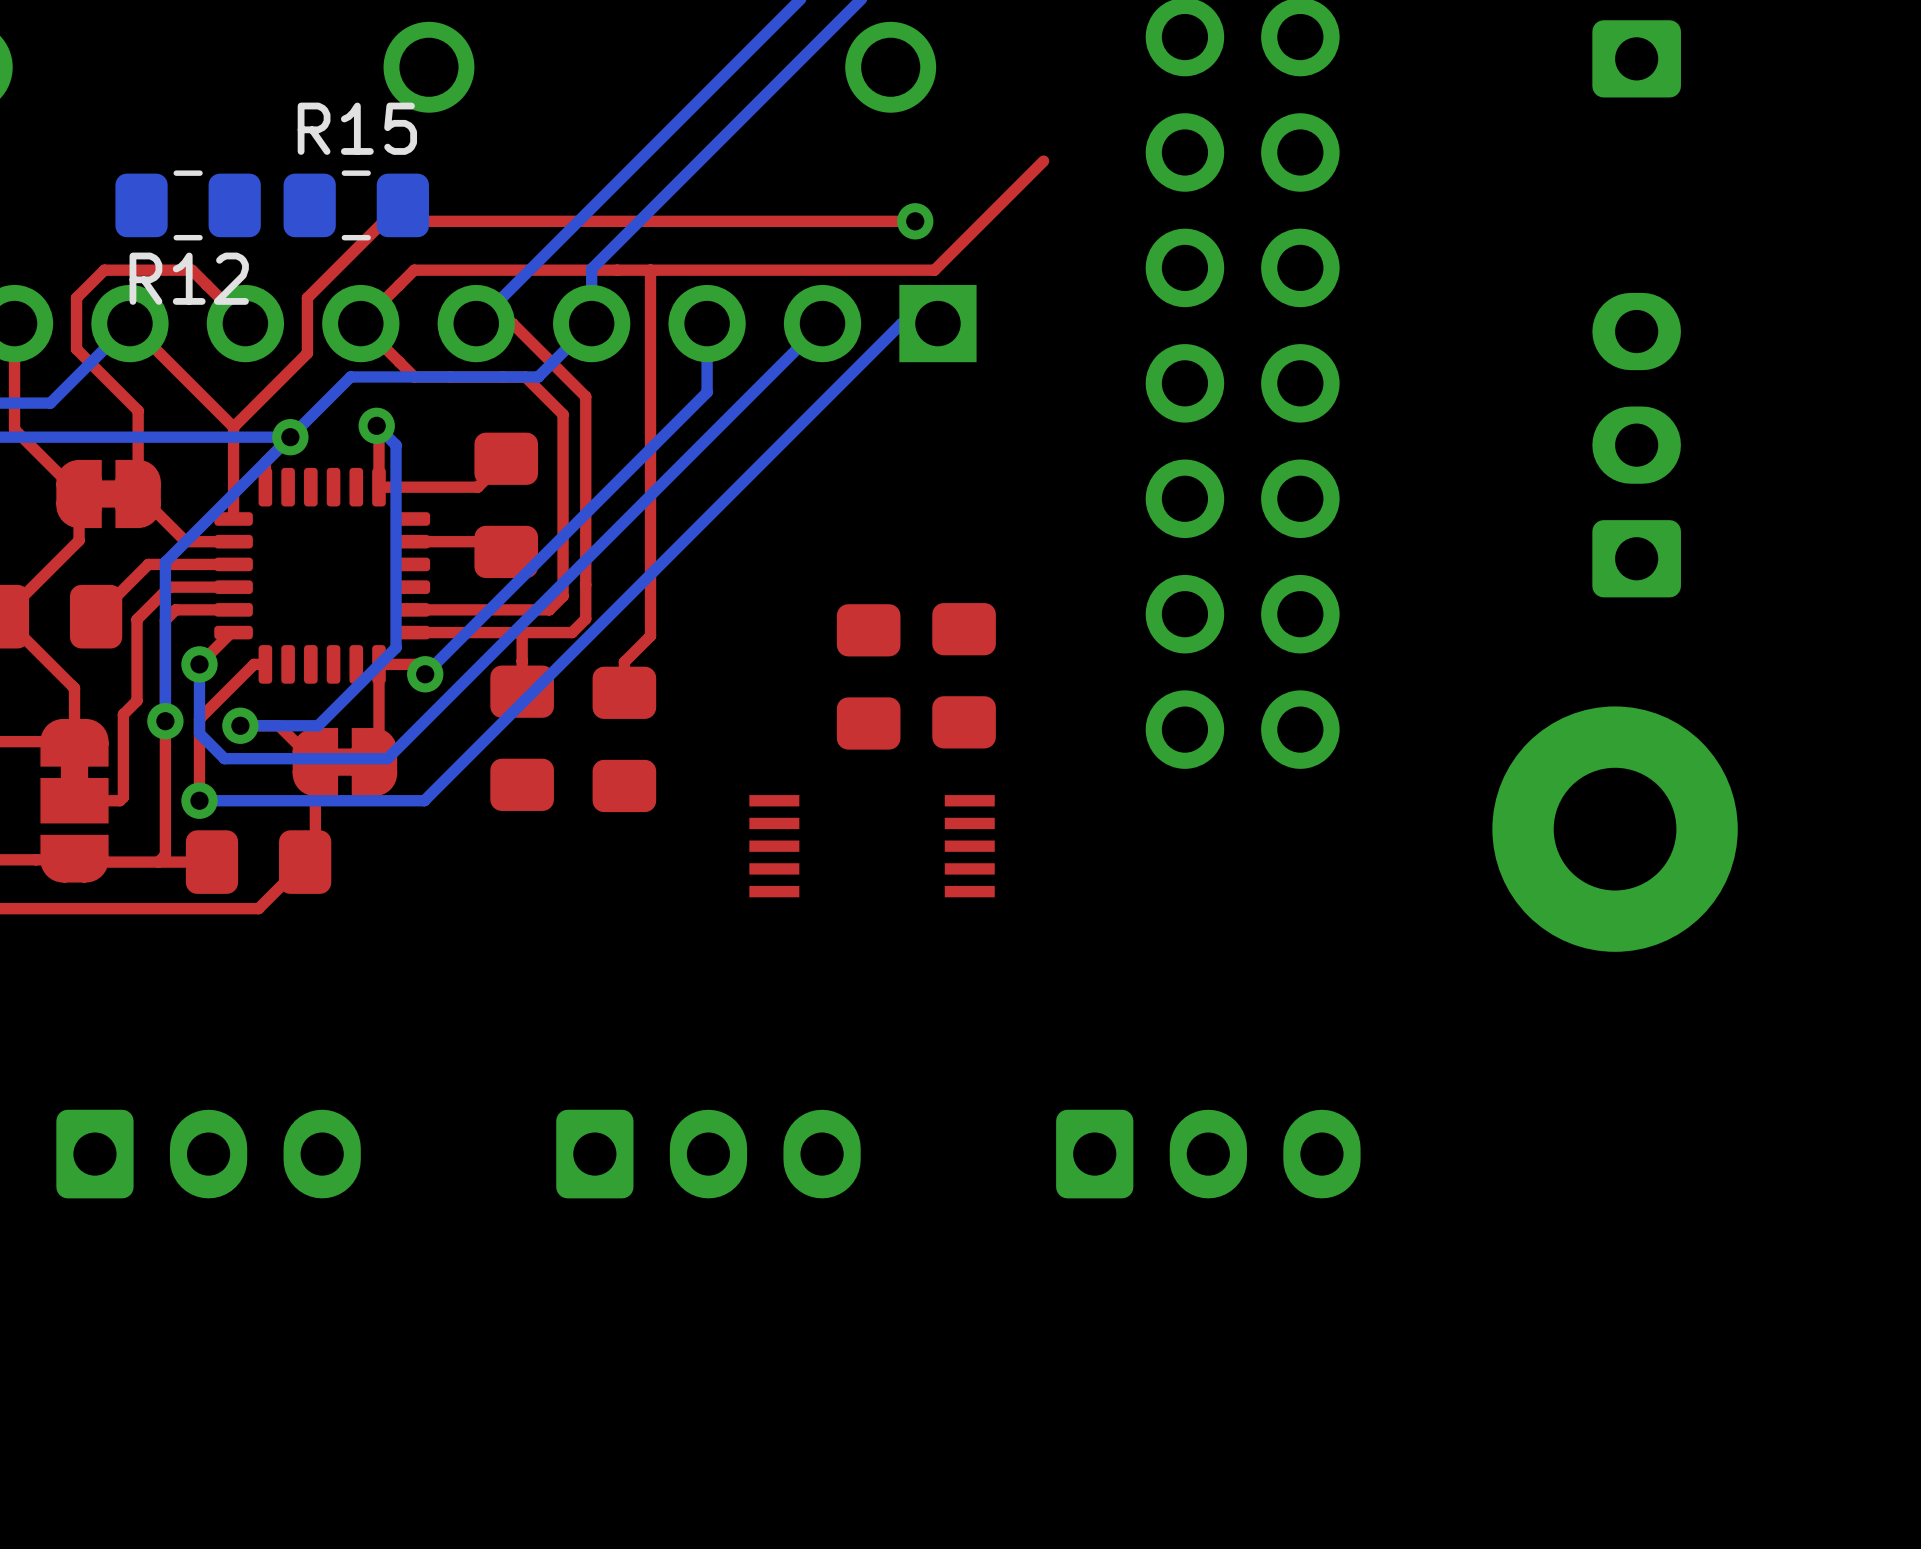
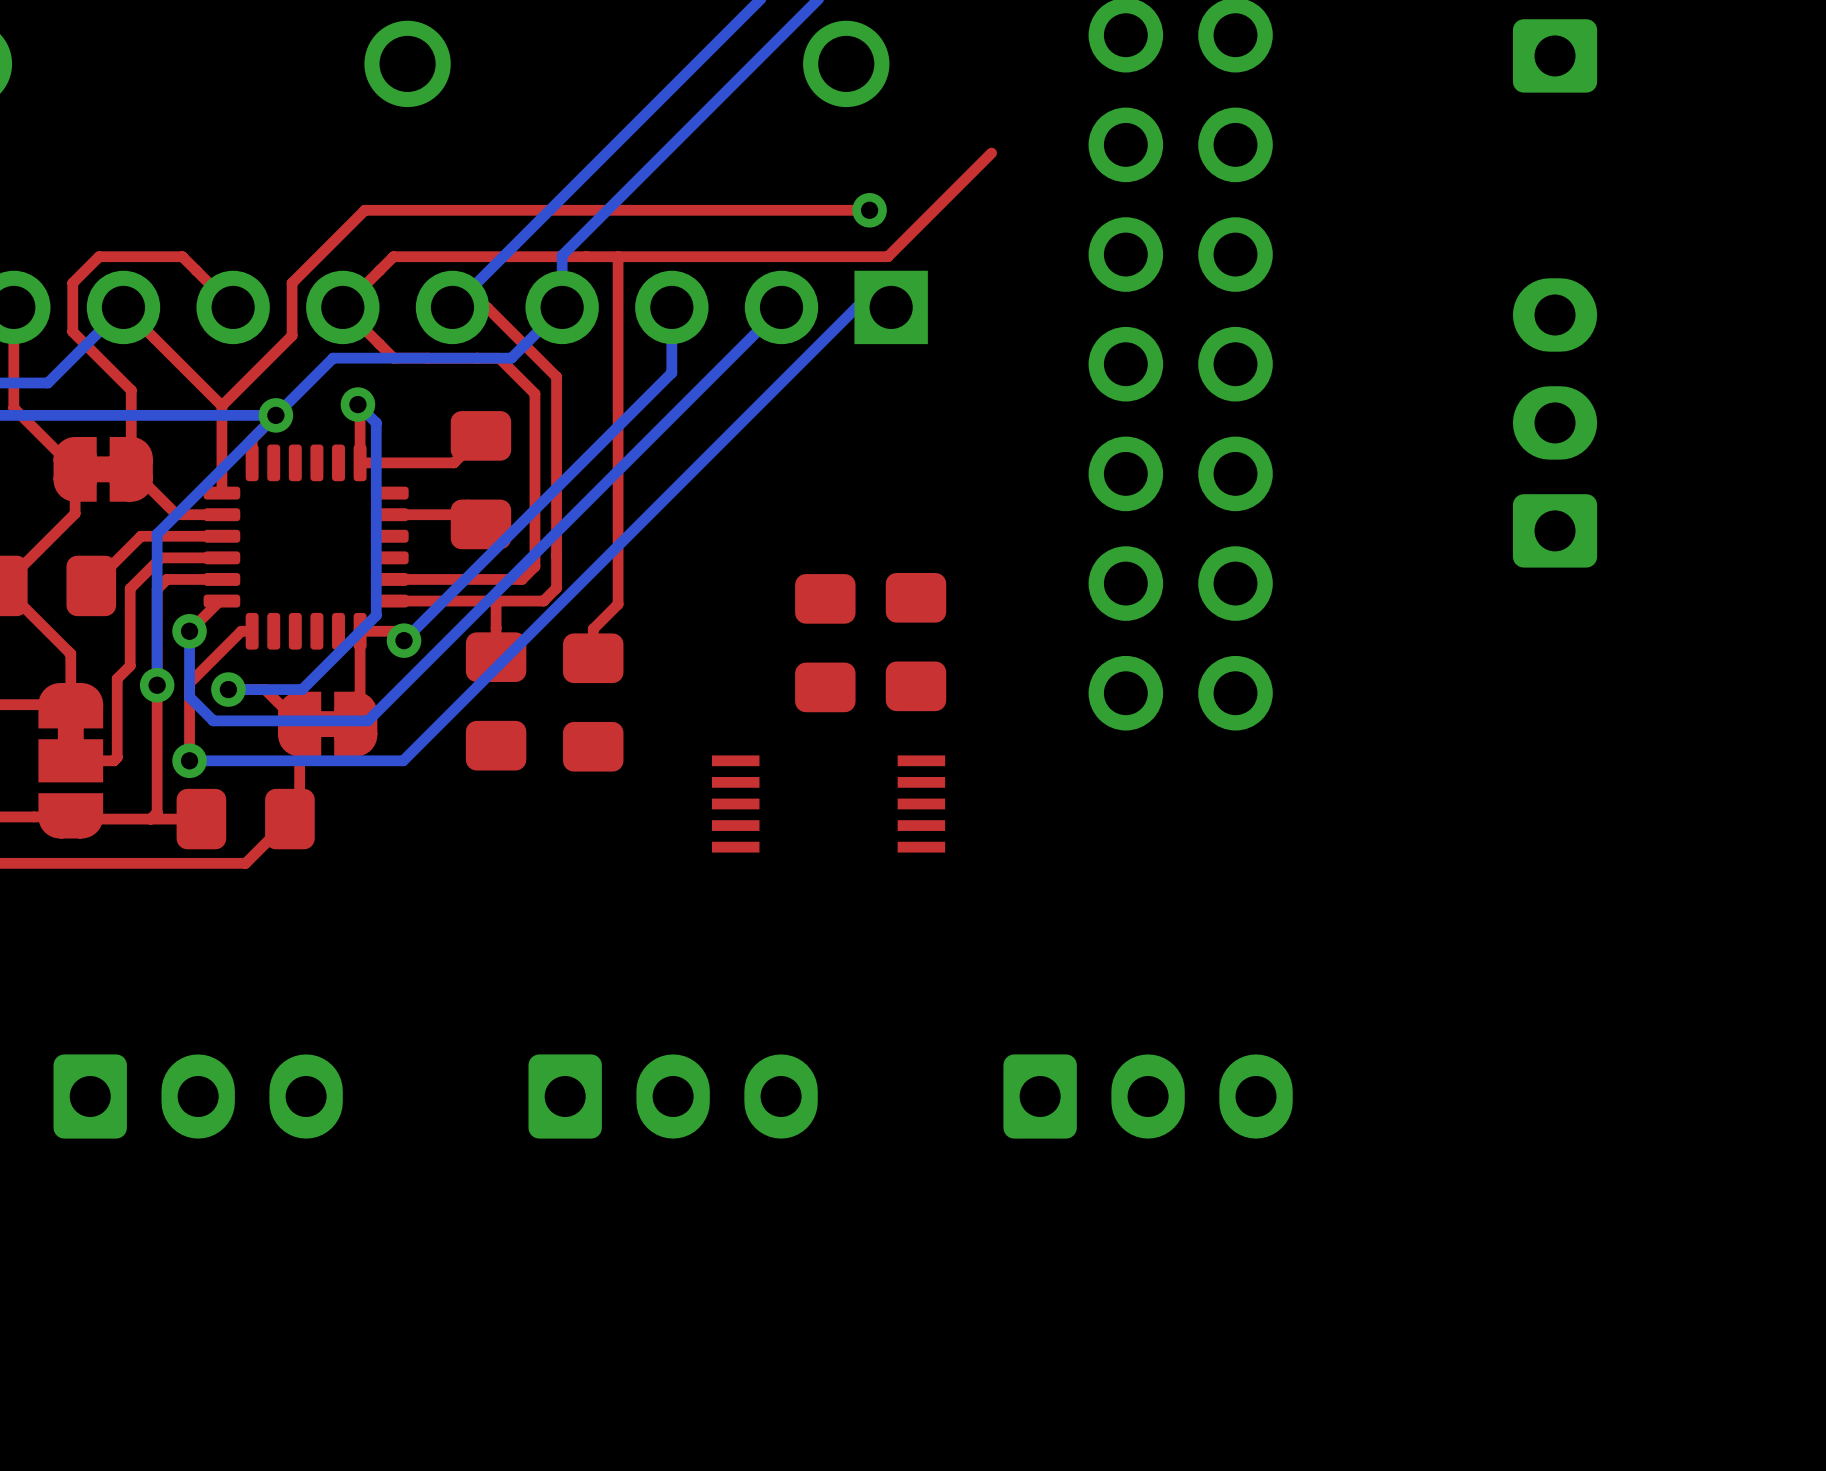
R12: (188, 205) -> none
R15: (356, 205) -> none
part: (1615, 829) -> none

